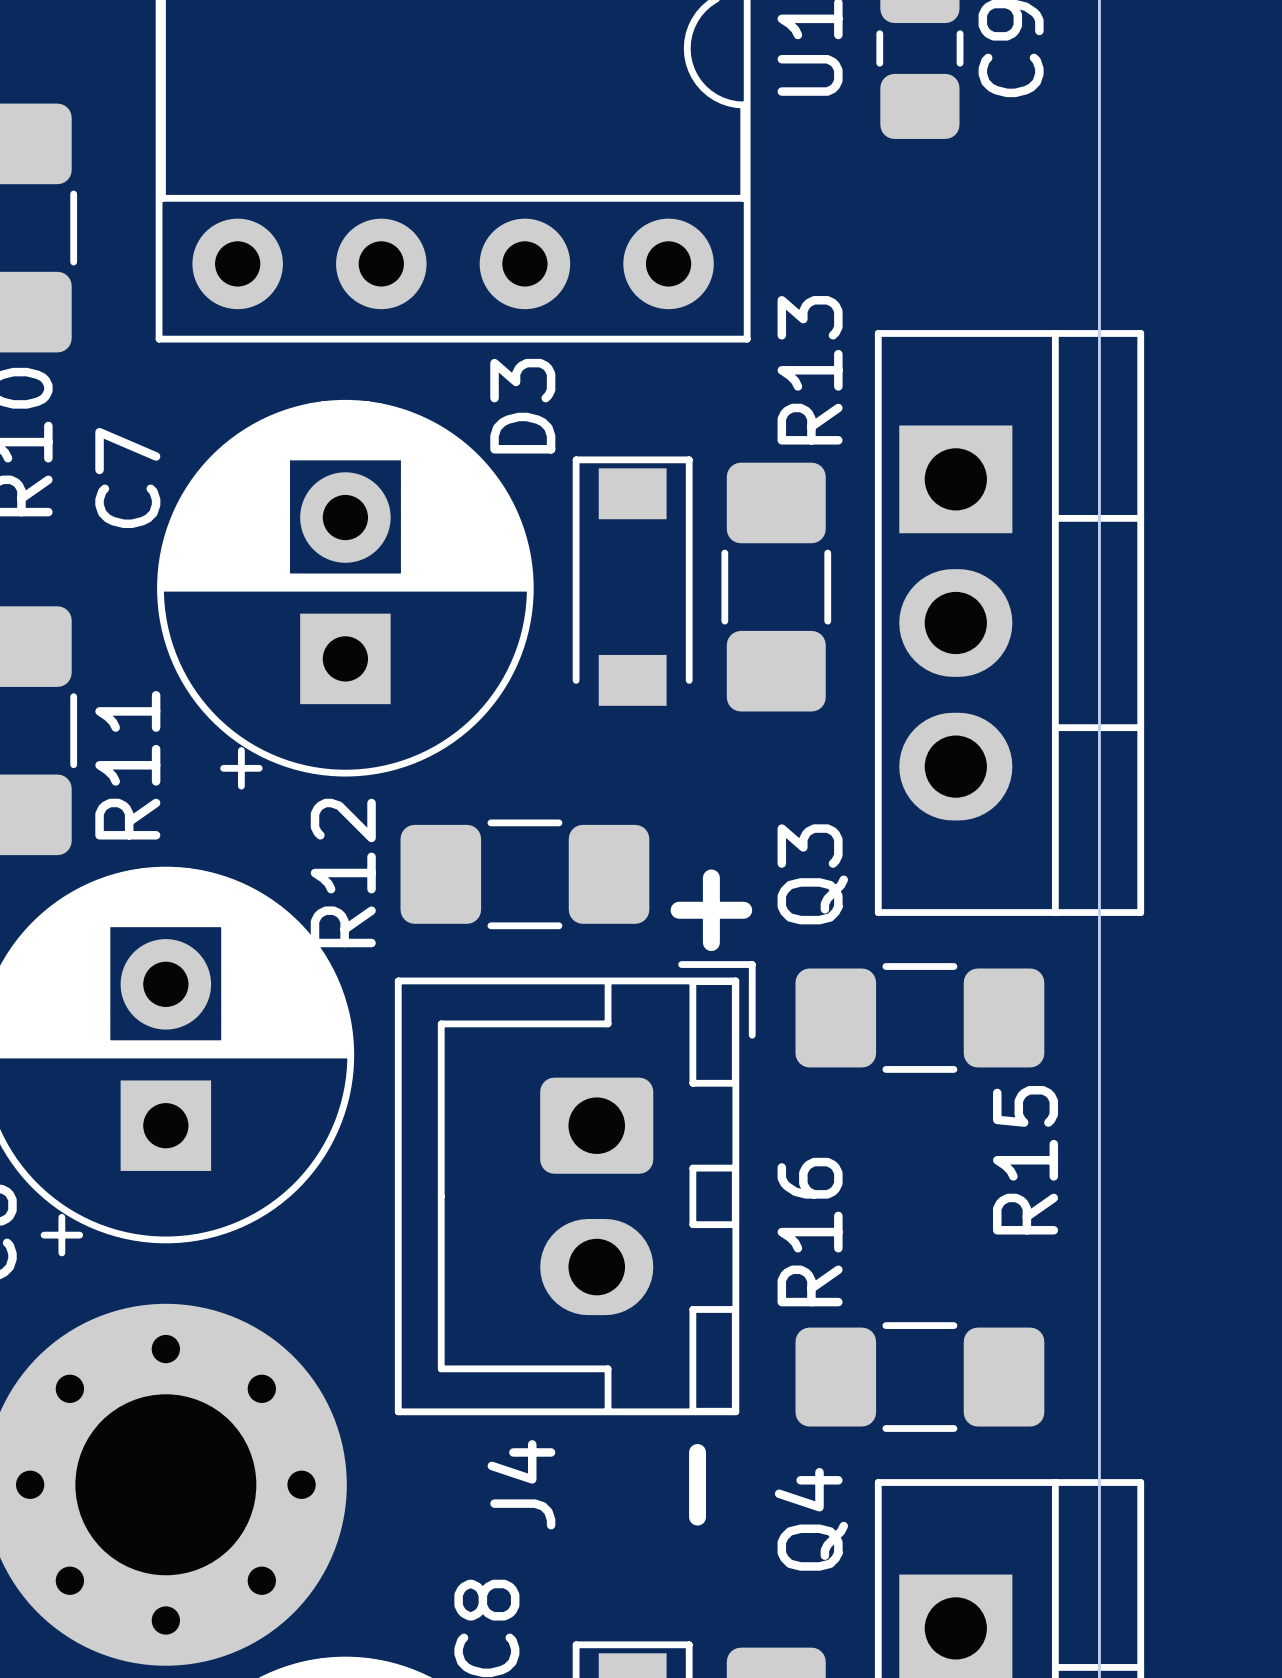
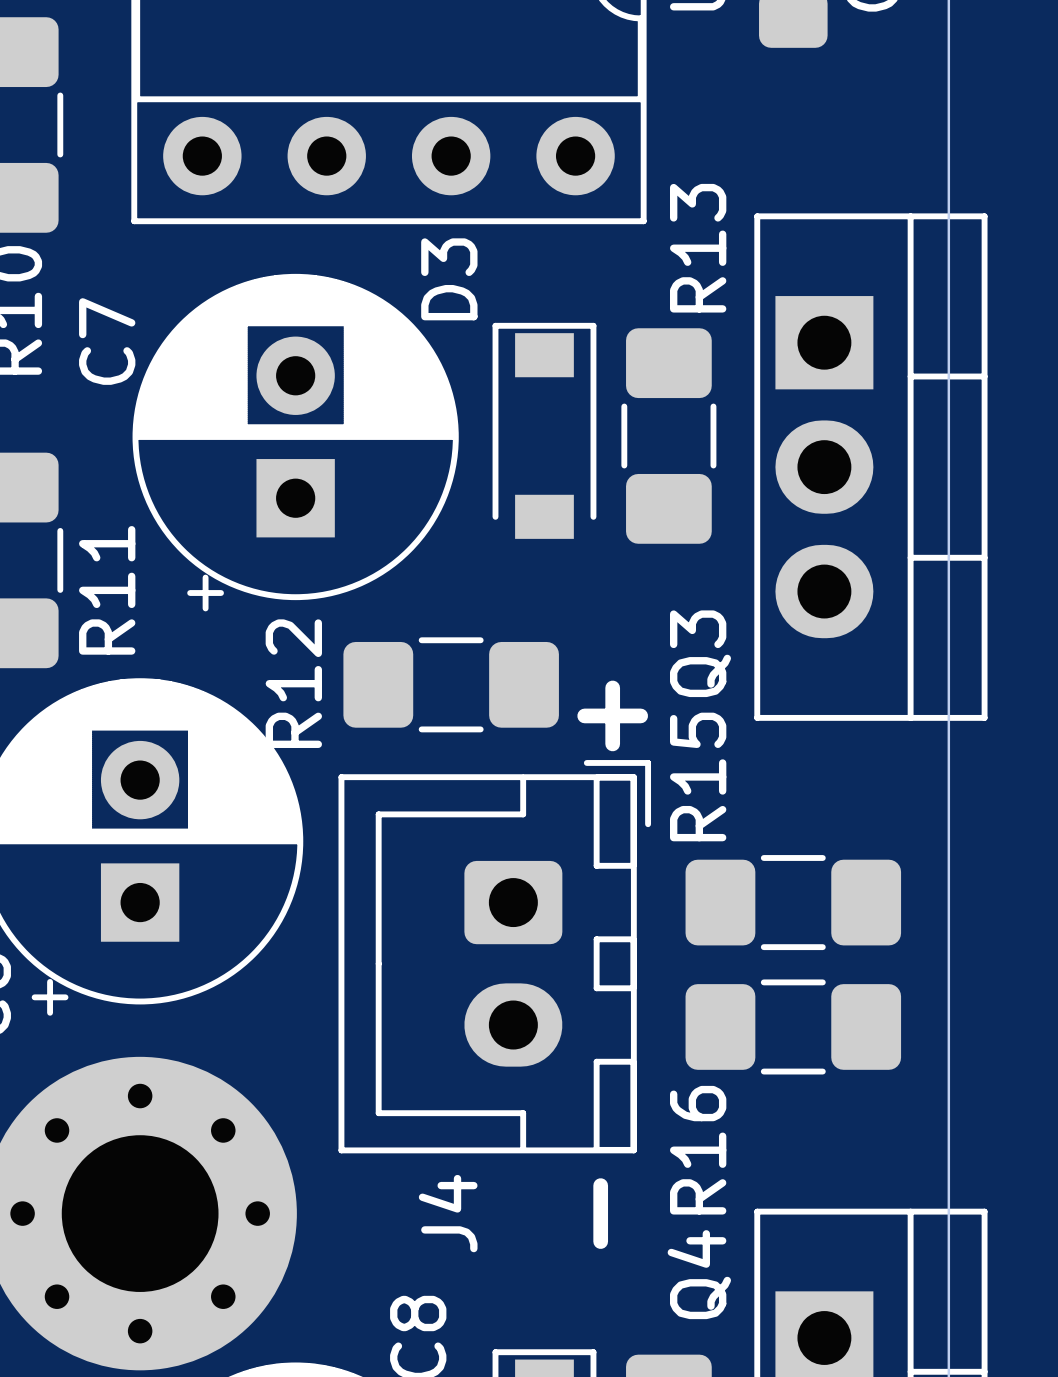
Q3 name position: Q3 (812, 874) -> Q3 (700, 653)
R15 position: (919, 1017) -> (793, 902)
R15 name position: R15 (1025, 1160) -> R15 (698, 776)
R16 name position: R16 (810, 1232) -> R16 (698, 1150)
R16 position: (919, 1377) -> (793, 1026)
Q4 name position: Q4 (811, 1519) -> Q4 (699, 1274)

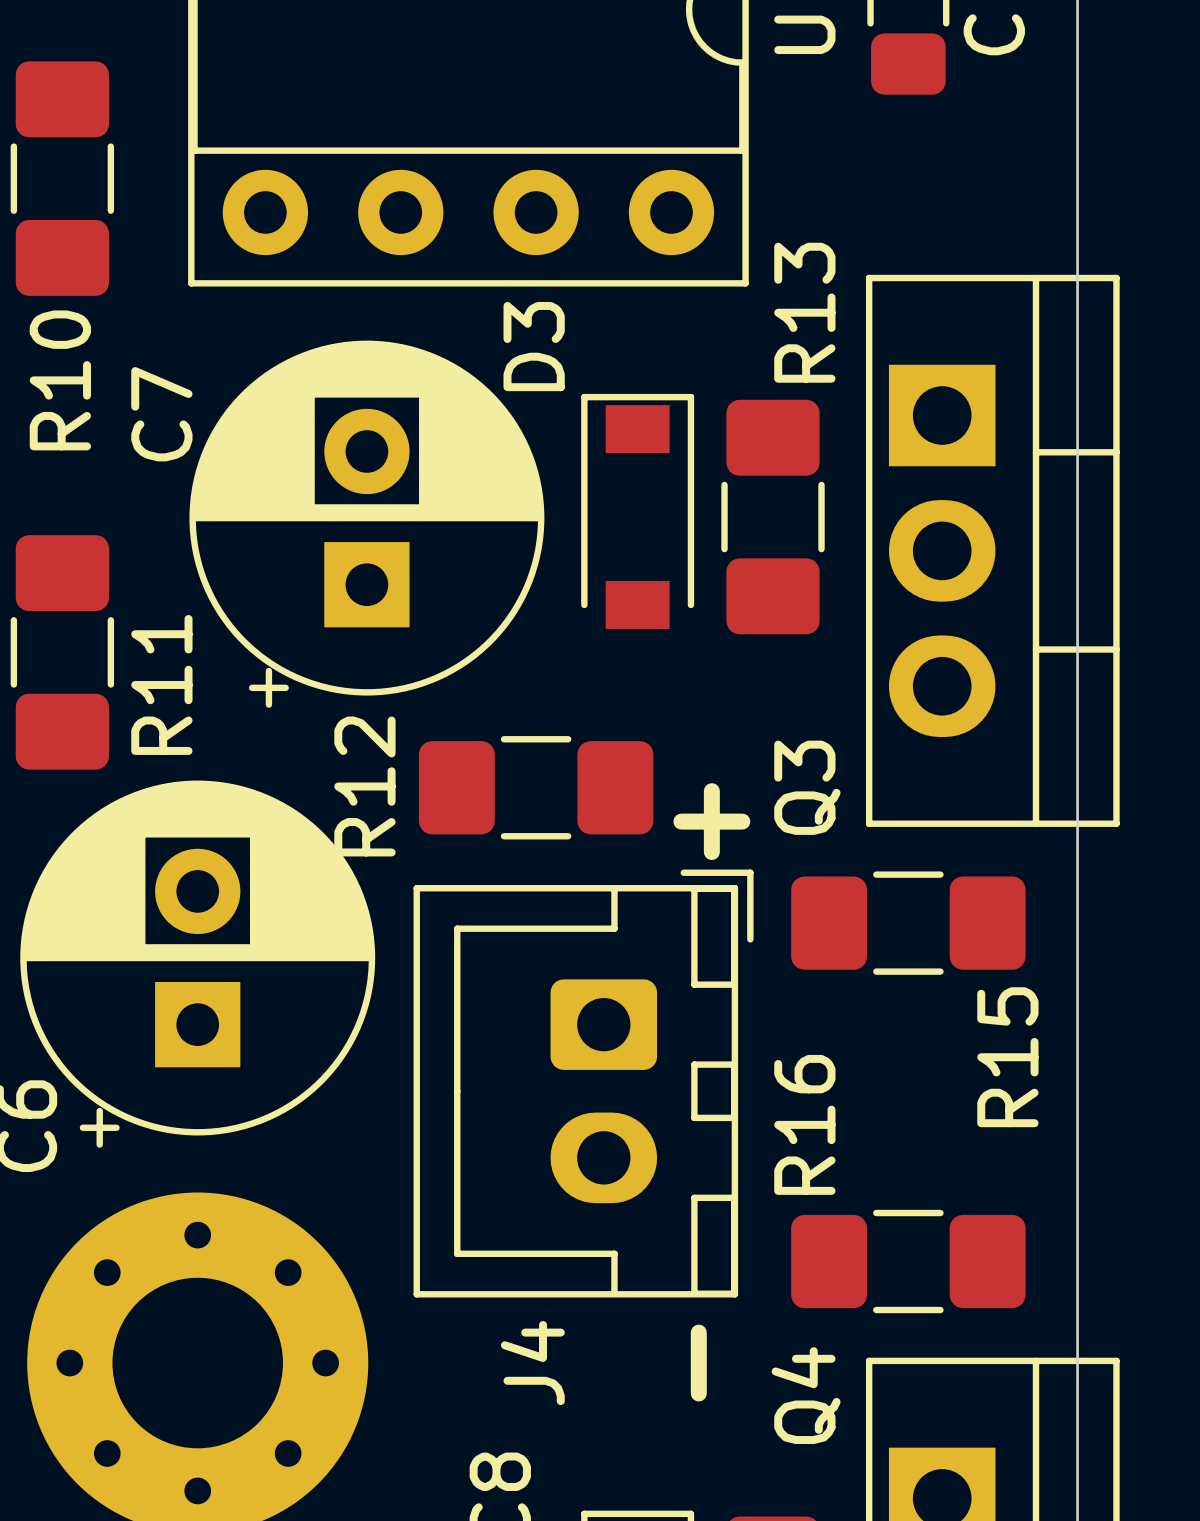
Q3 name position: Q3 (700, 653) -> Q3 (807, 787)
R15 name position: R15 (698, 776) -> R15 (1007, 1057)
R15 position: (793, 902) -> (908, 923)
R16 position: (793, 1026) -> (908, 1261)
R16 name position: R16 (698, 1150) -> R16 (804, 1124)
Q4 name position: Q4 (699, 1274) -> Q4 (806, 1395)

